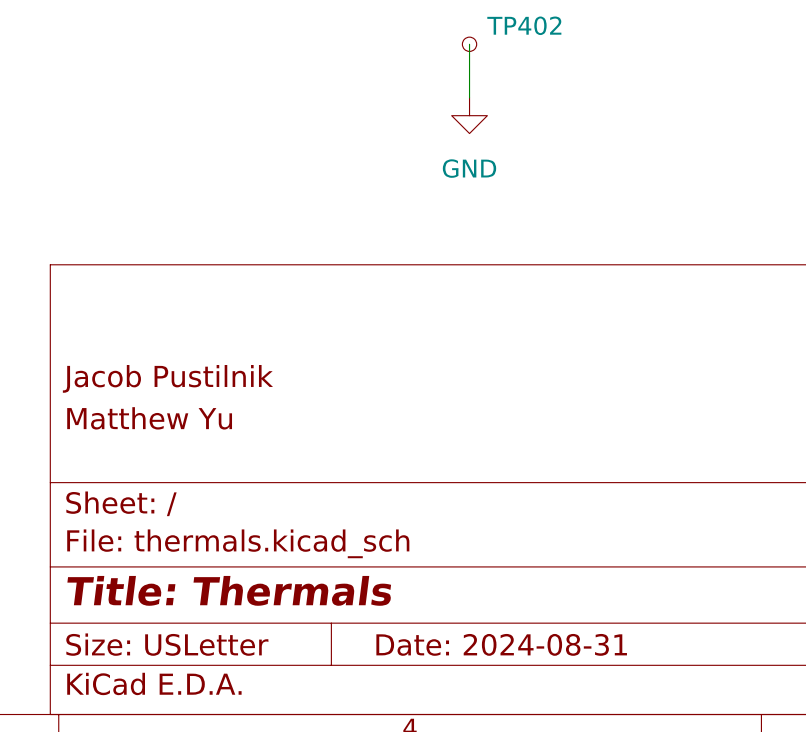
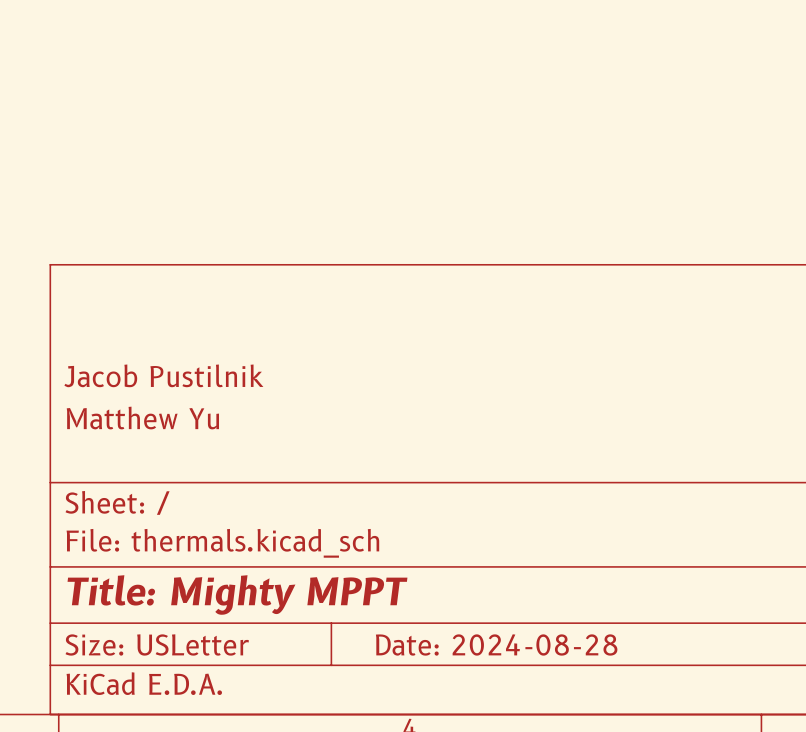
wire: (469, 44) (469, 97) -> none
TP402: (469, 44) -> none
power symbol: GND (469, 115) -> none
title block: Title: Thermals (229, 590) -> Title: Mighty MPPT (237, 594)
title block: Date: 2024-08-31 (501, 644) -> Date: 2024-08-28 (496, 644)

